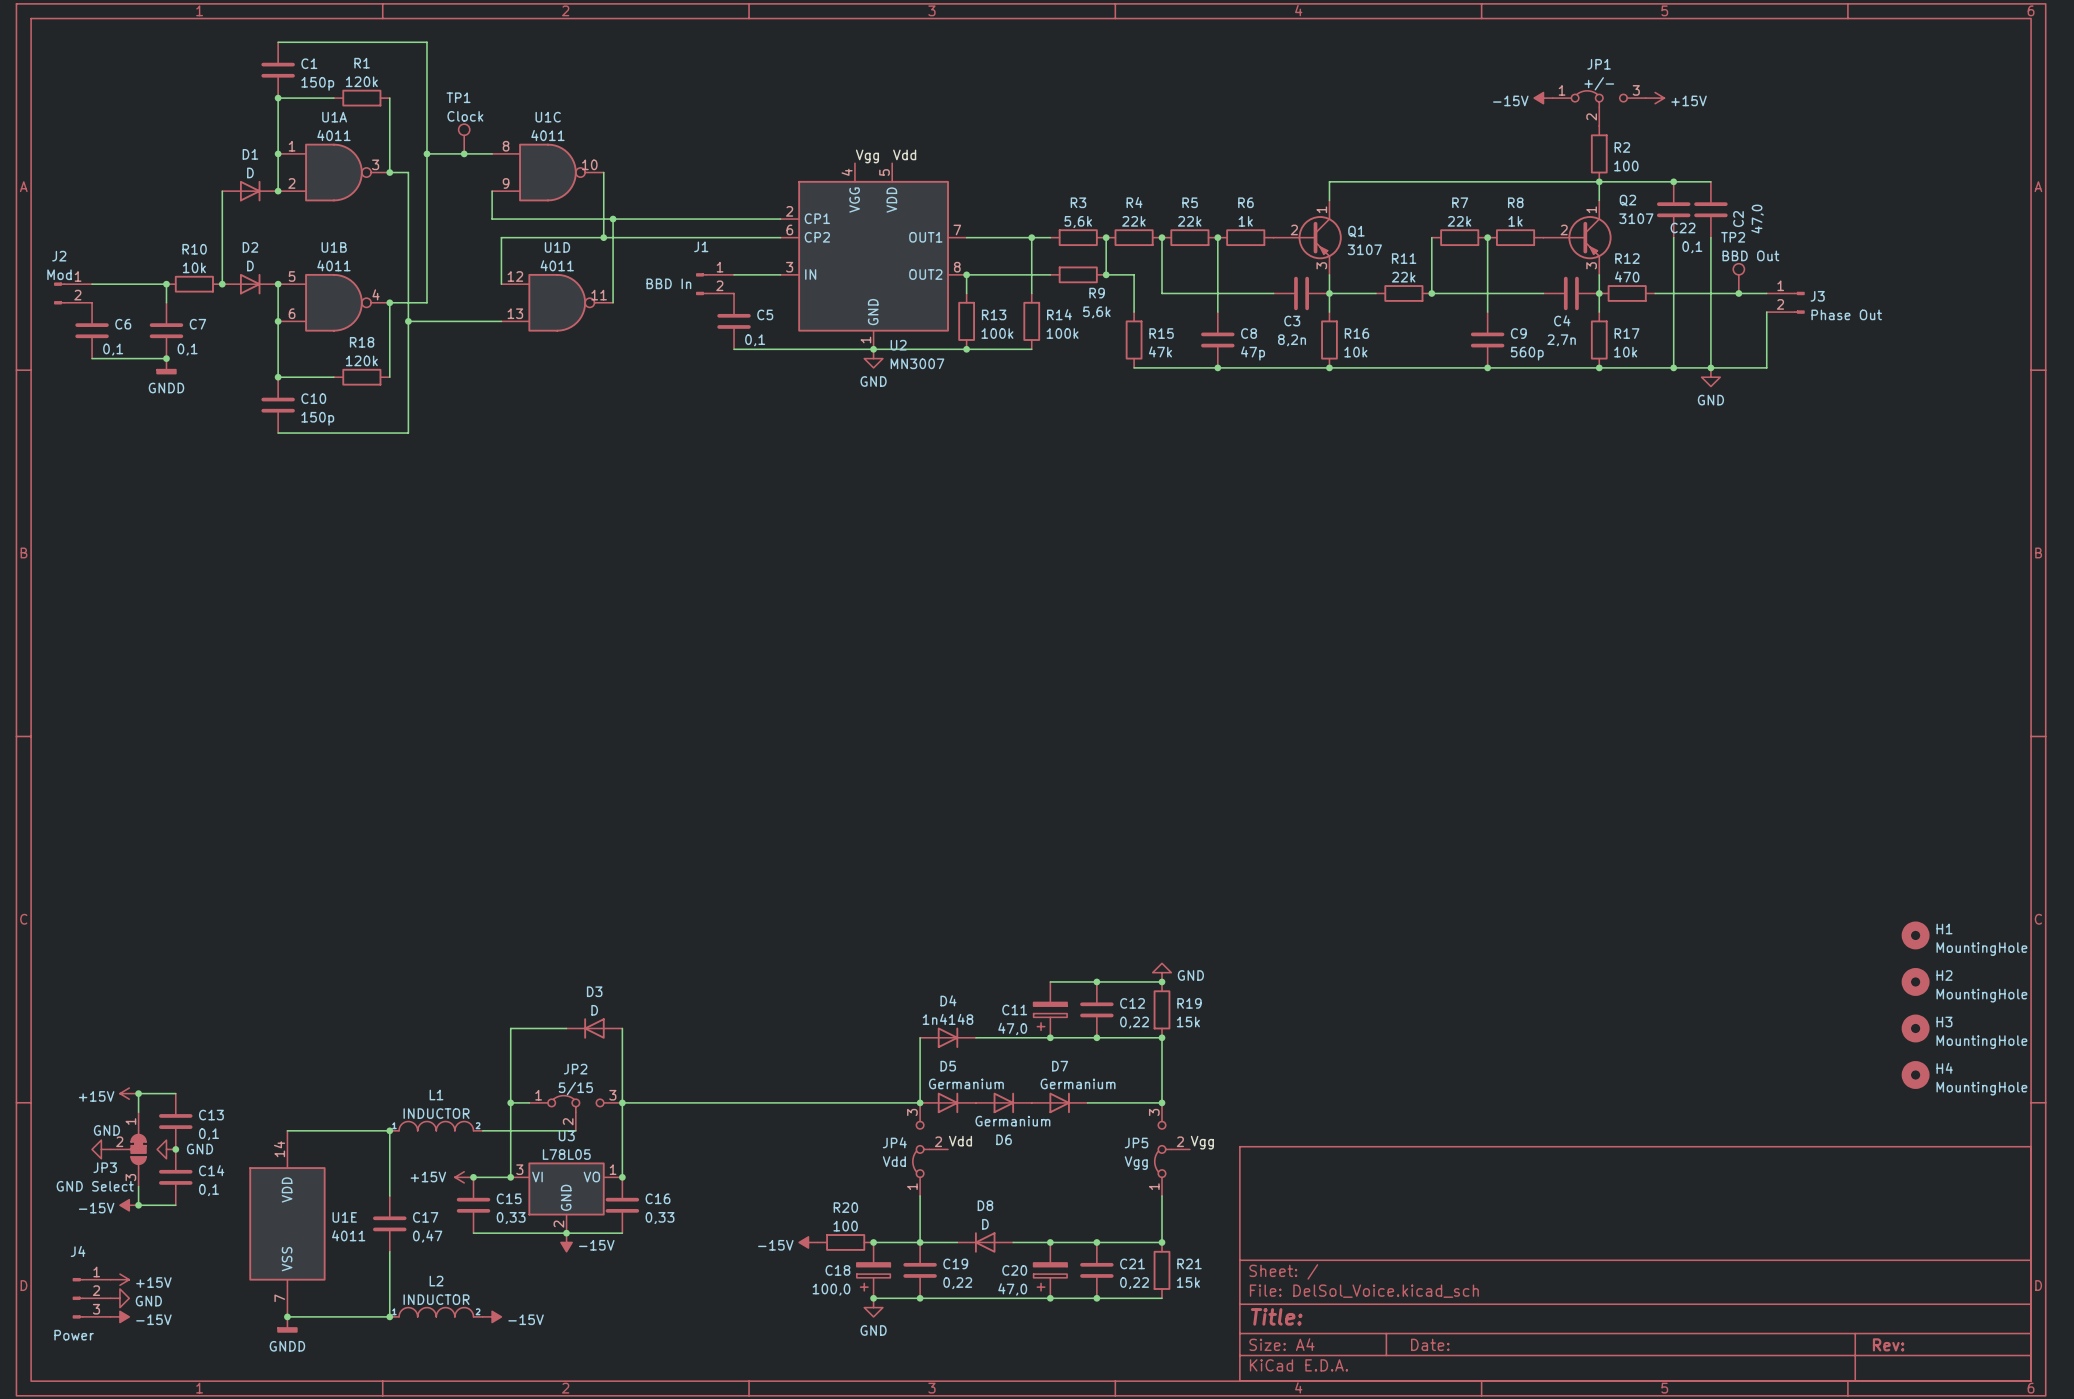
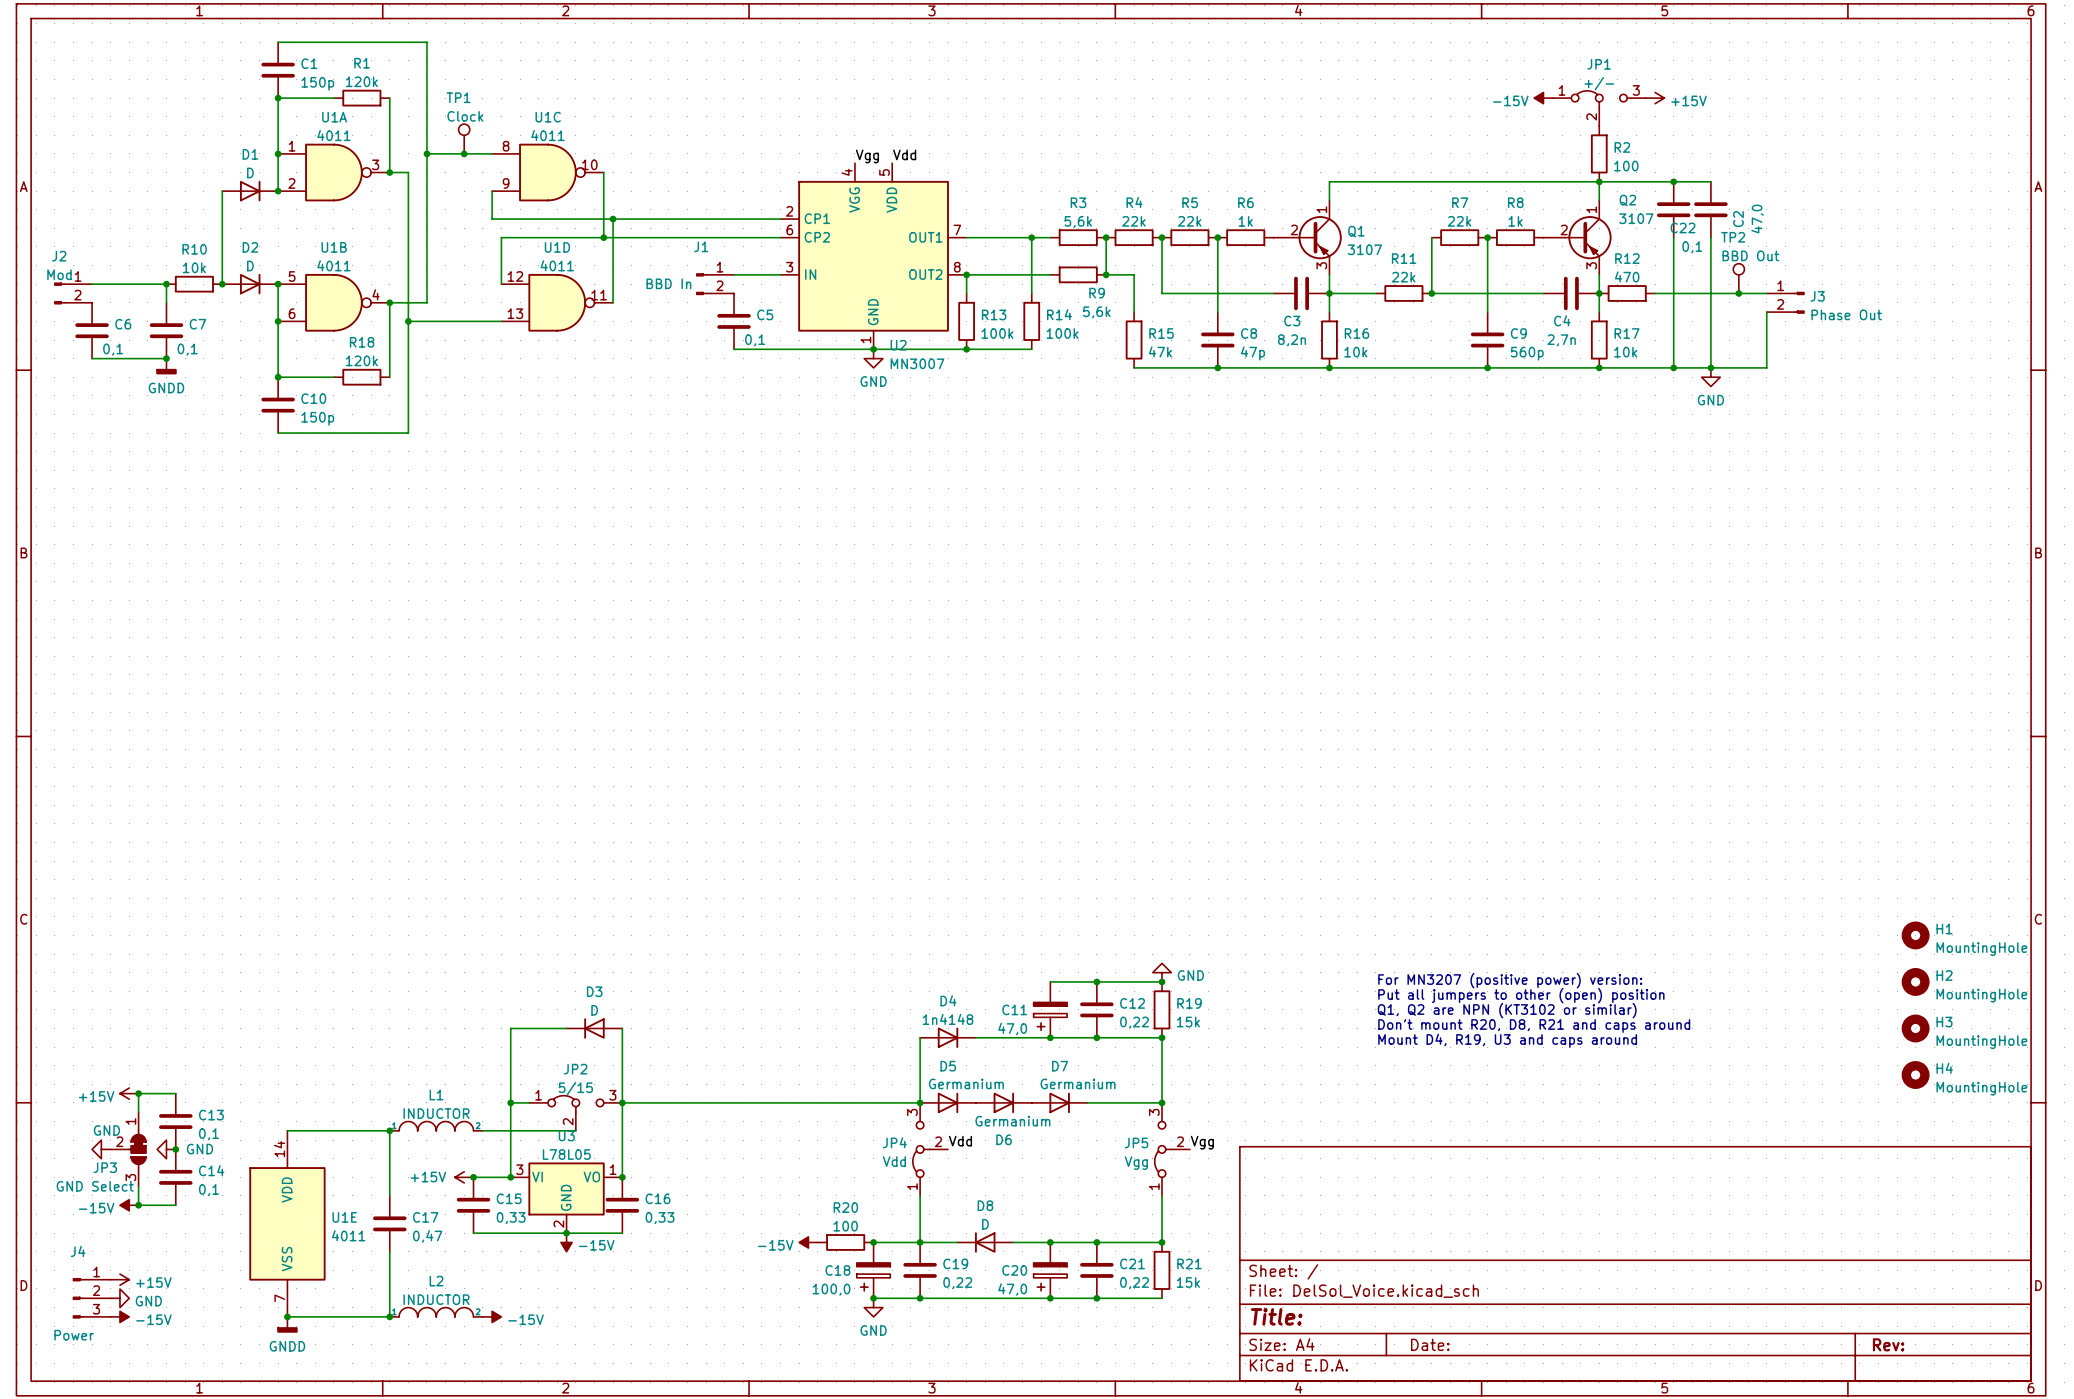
text: none -> For MN3207 (positive power) version: (1510, 980)
text: none -> Put all jumpers to other (open) position (1521, 995)
text: none -> Q1, Q2 are NPN (КТ3102 or similar) (1507, 1010)
text: none -> Don't mount R20, D8, R21 and caps around (1534, 1026)
text: none -> Mount D4, R19, U3 and caps around (1507, 1040)

